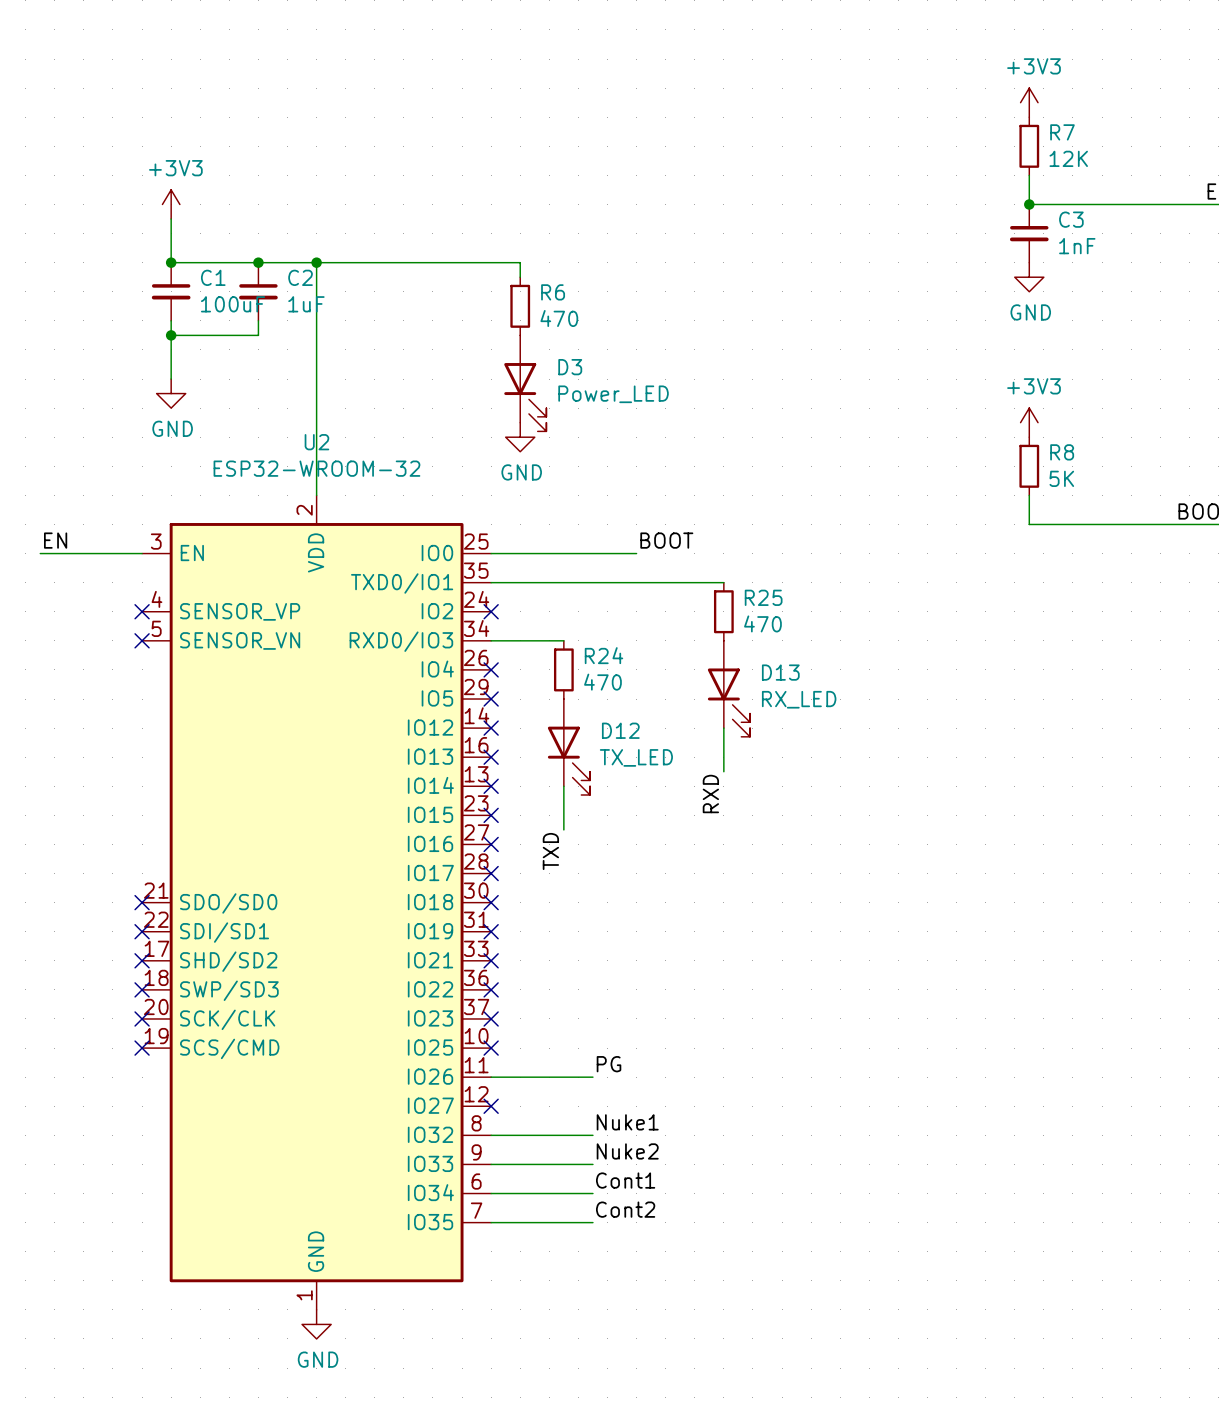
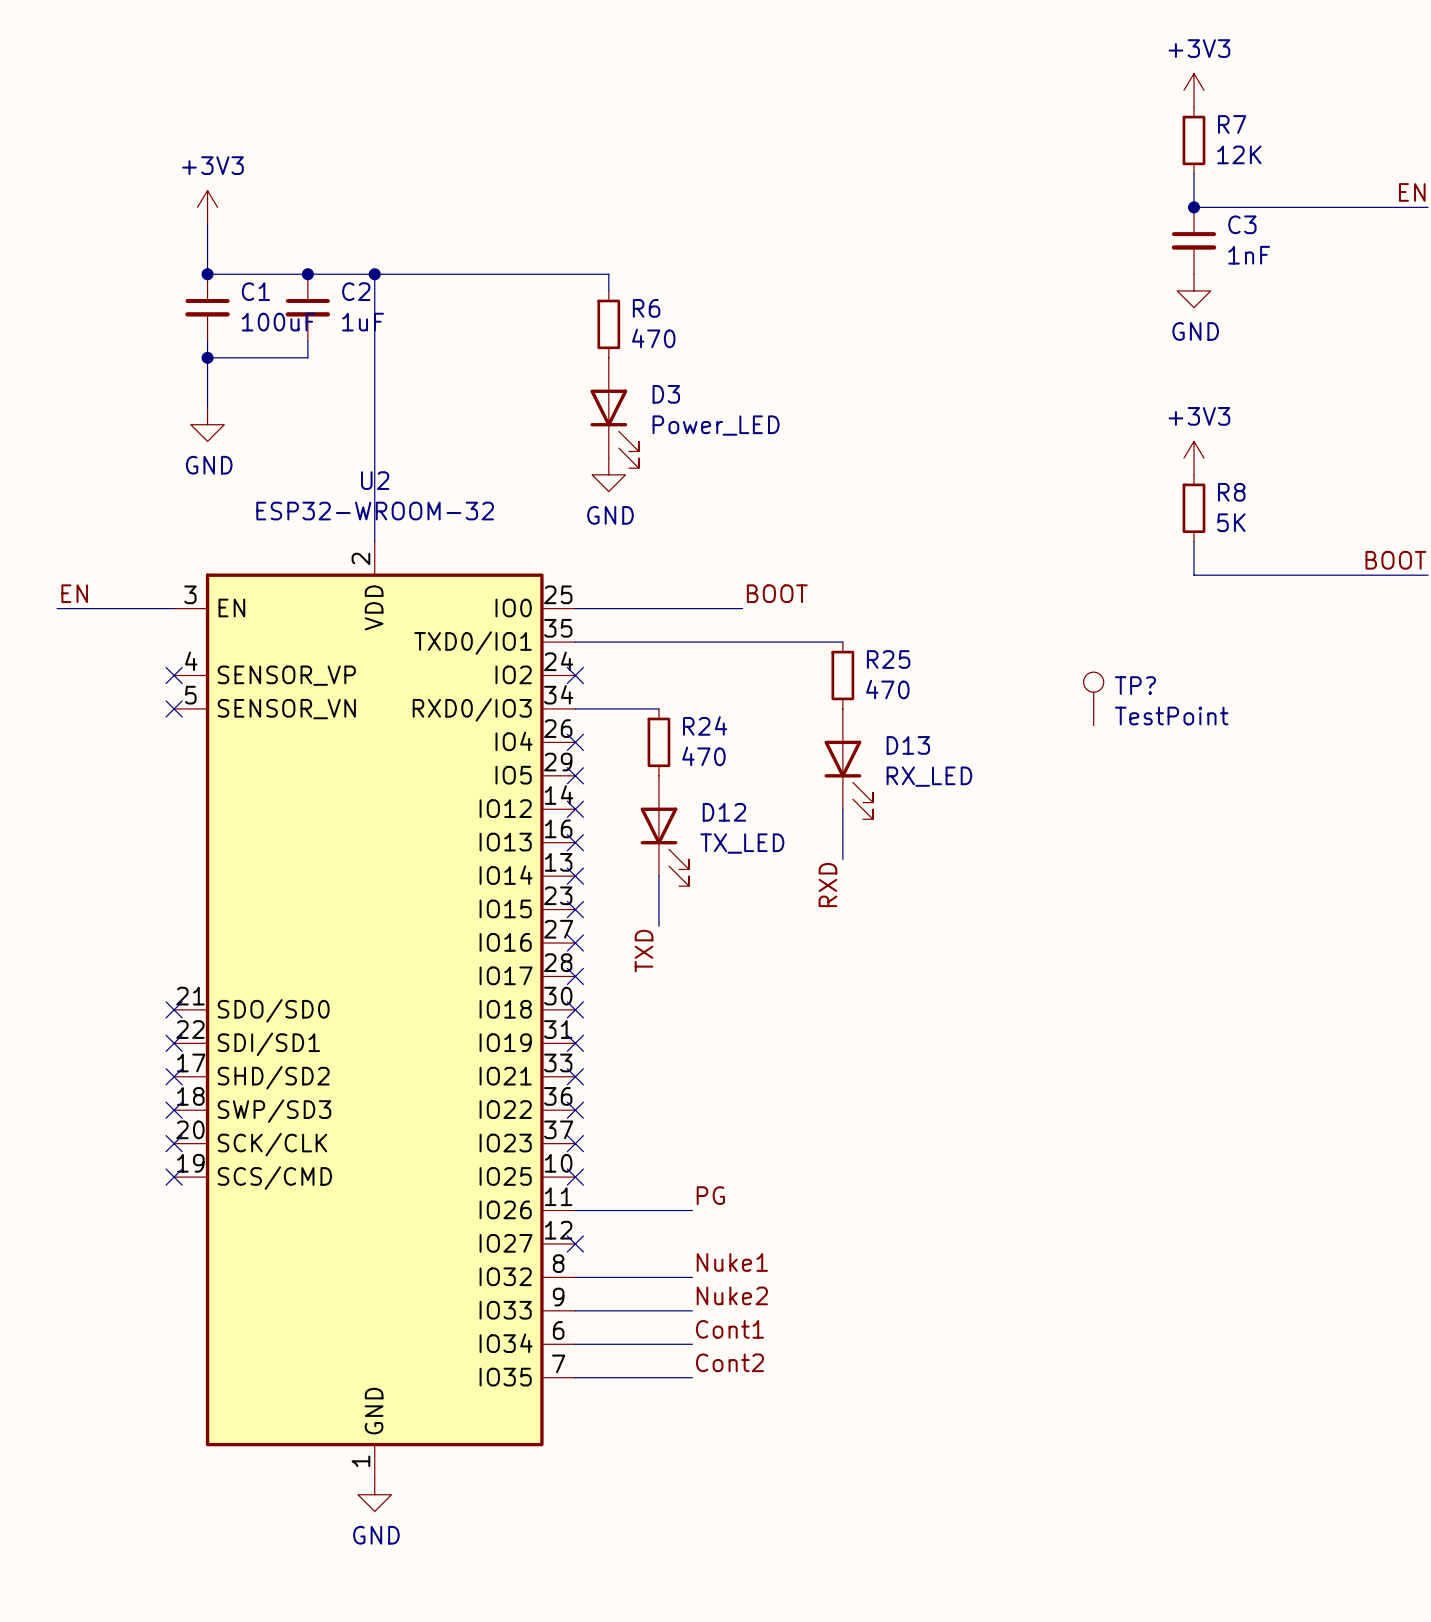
TP?: none -> TestPoint (1093, 698)

